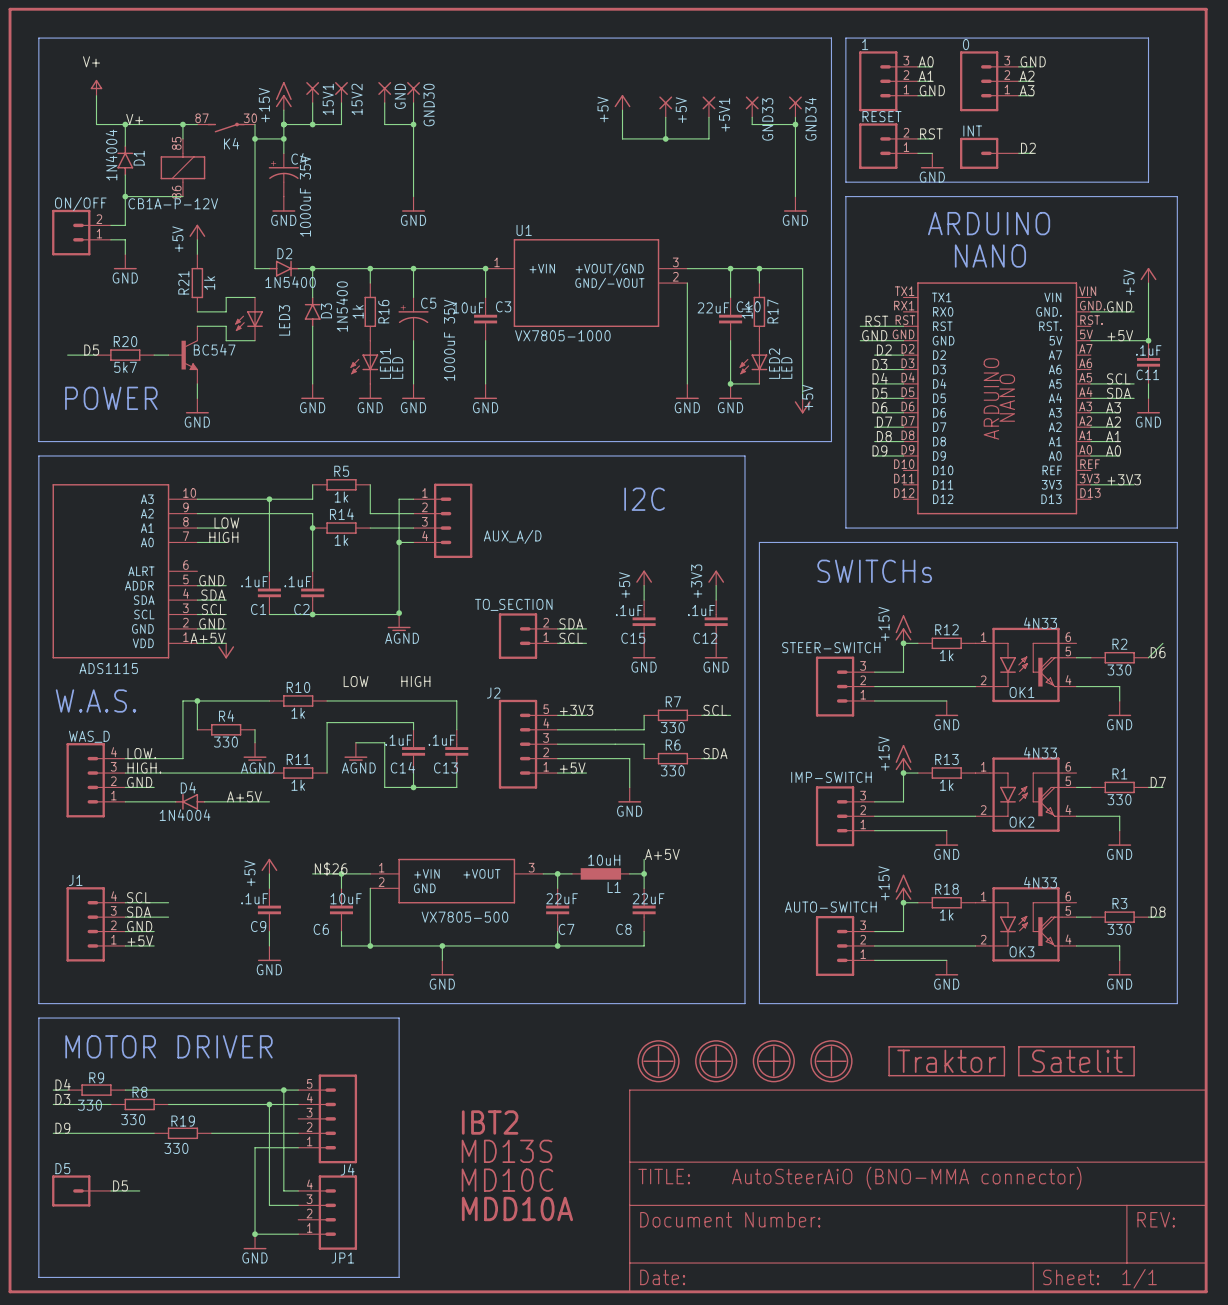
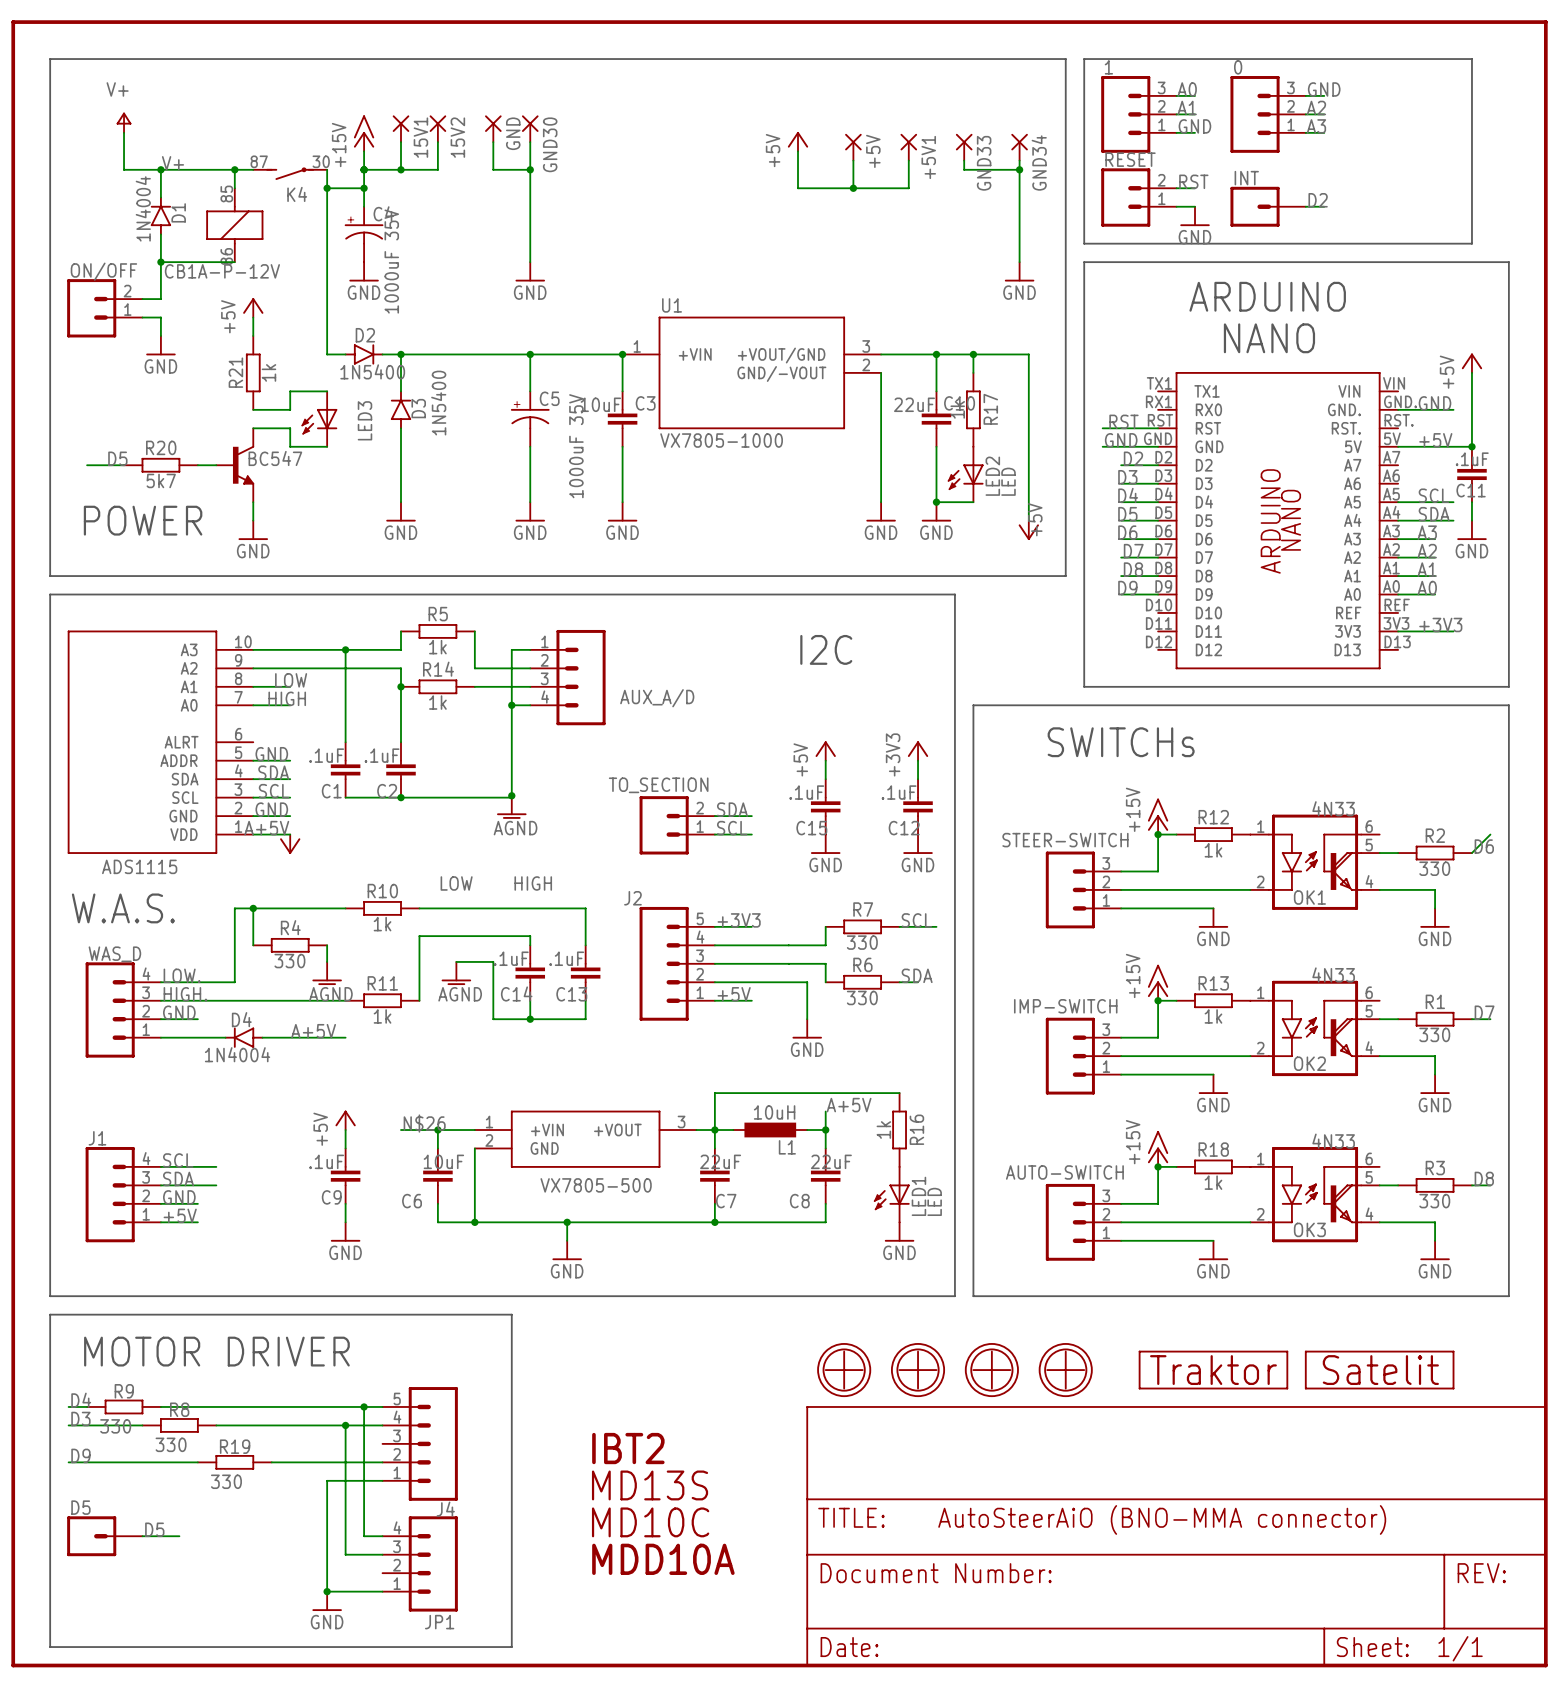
wire: (370, 268) (370, 283) -> none
junction: (370, 268) -> none
R16 position: (370, 311) -> (899, 1130)
LED1 position: (364, 362) -> (891, 1194)
power symbol: GND (370, 391) -> none
wire: none -> (899, 1093) (714, 1093) (714, 1130)
power symbol: none -> GND (899, 1232)

